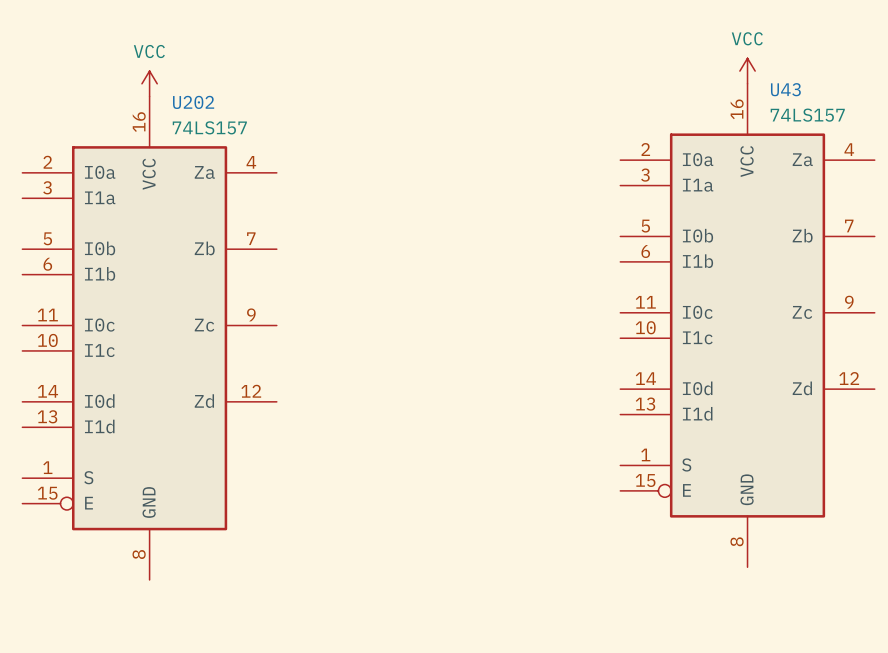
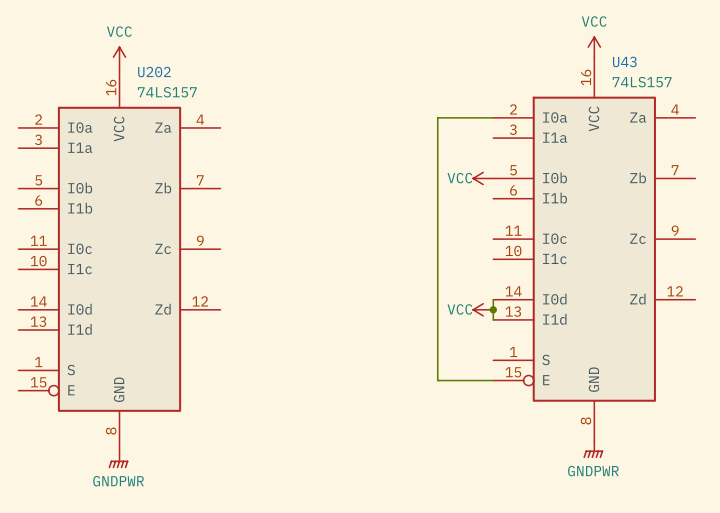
wire: none -> (493, 117) (437, 117) (437, 380) (493, 380)
power symbol: none -> VCC (483, 178)
wire: none -> (493, 299) (493, 319)
power symbol: none -> VCC (483, 309)
junction: none -> (493, 309)
power symbol: none -> GNDPWR (593, 449)
power symbol: none -> GNDPWR (118, 459)

